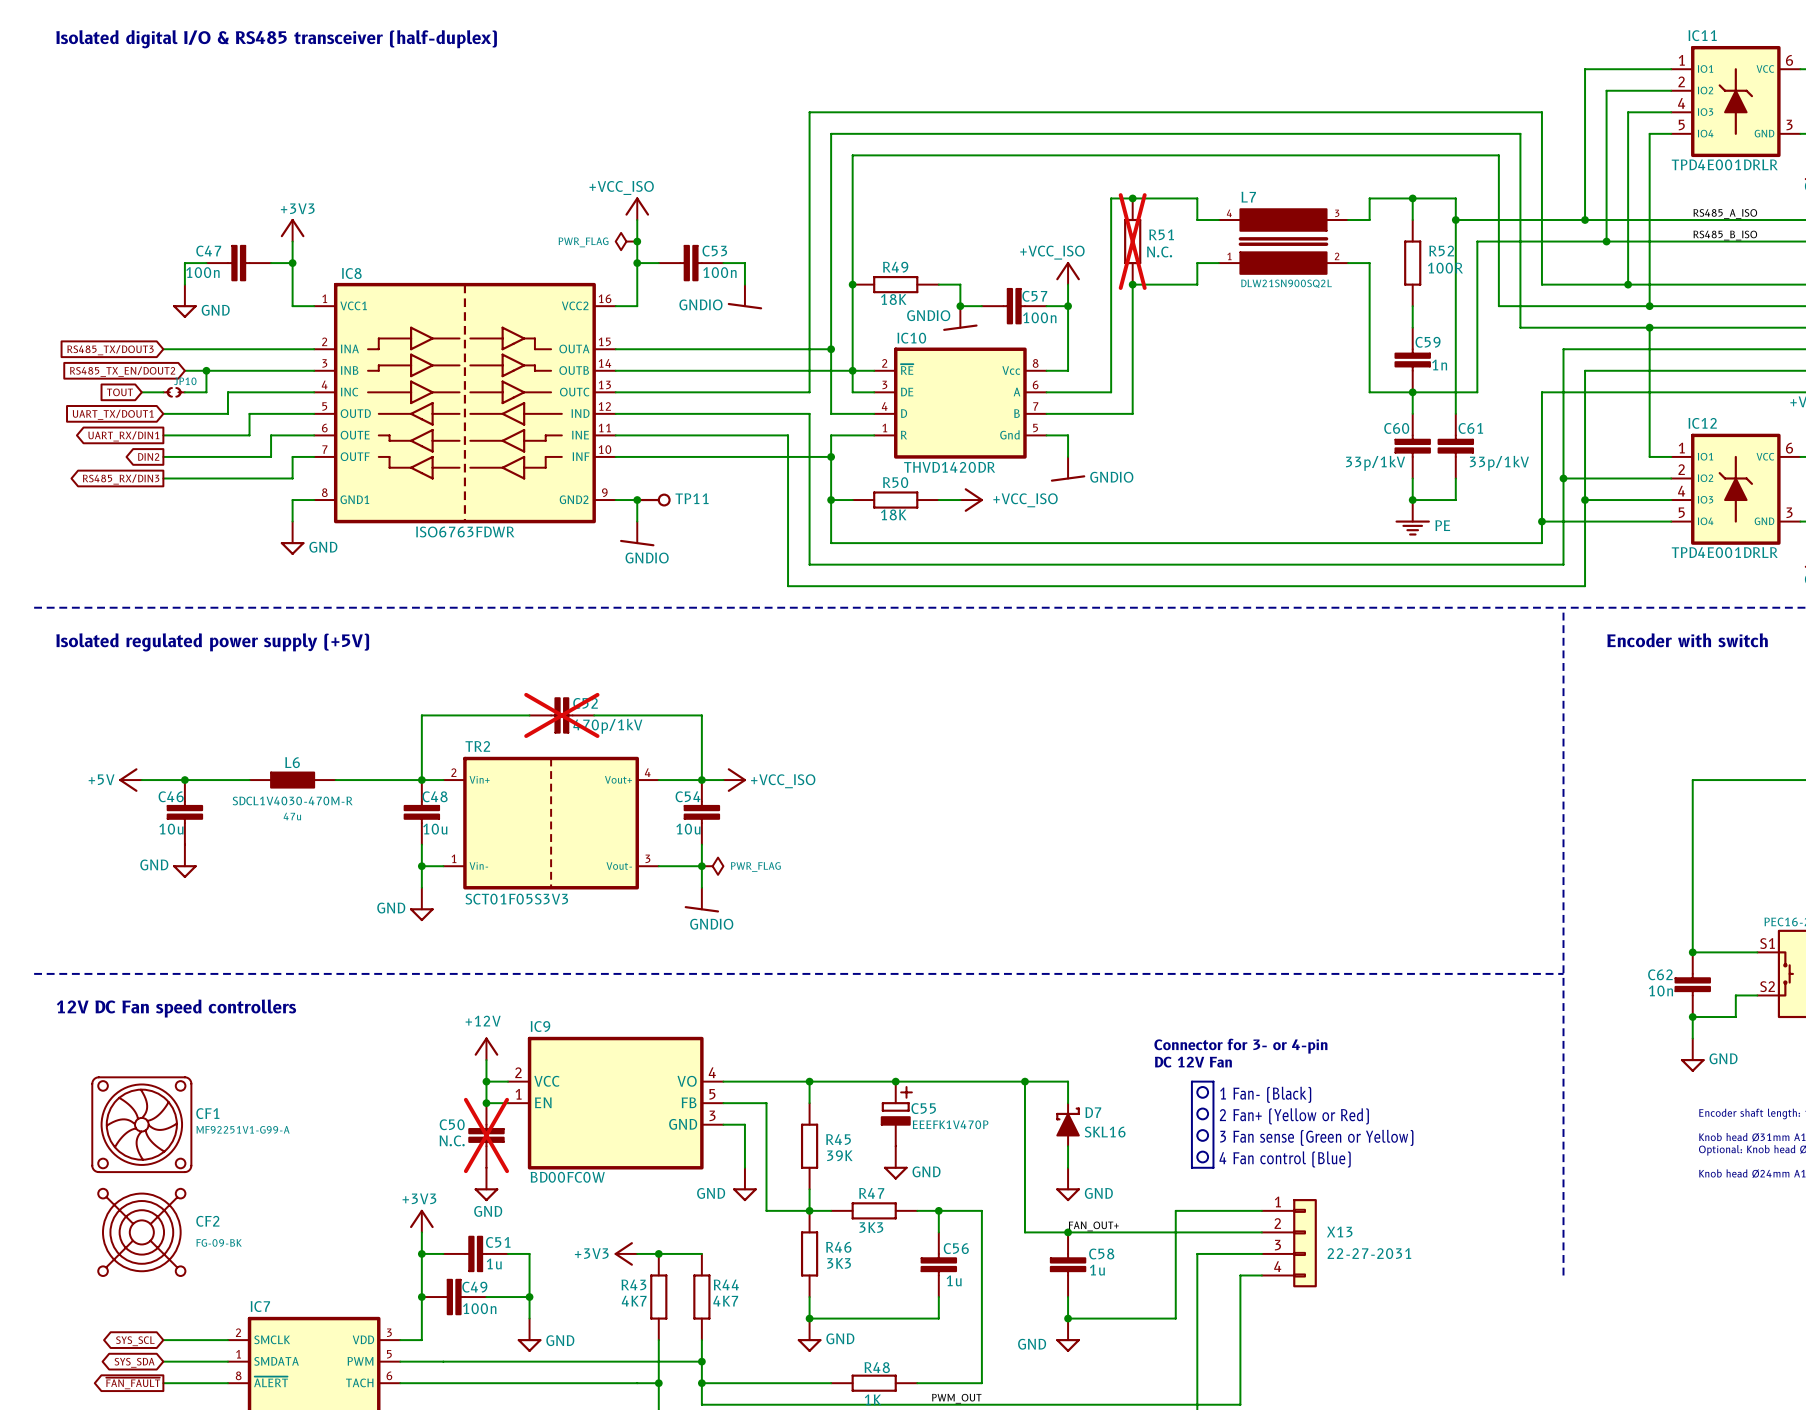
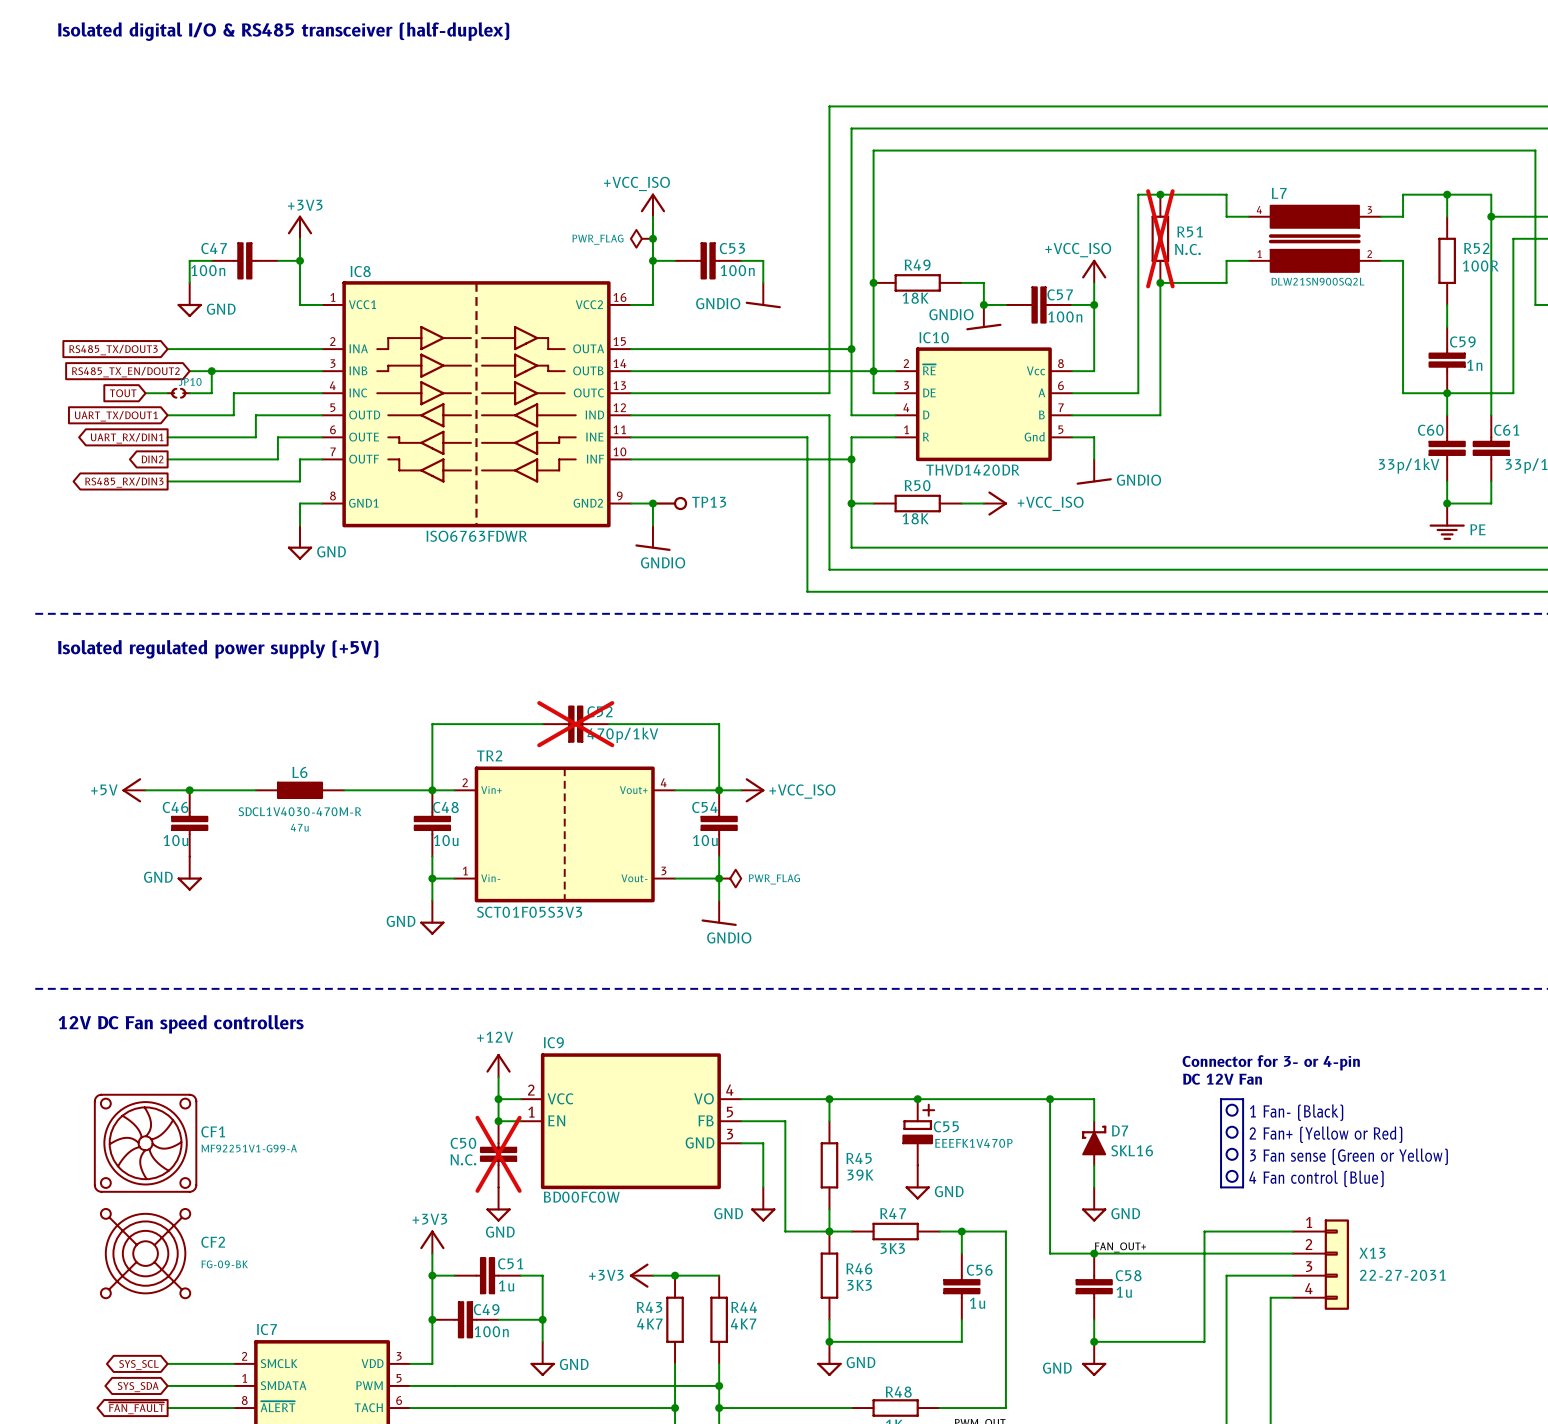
TP11 name: TP11 (692, 498) -> TP13 (709, 502)

